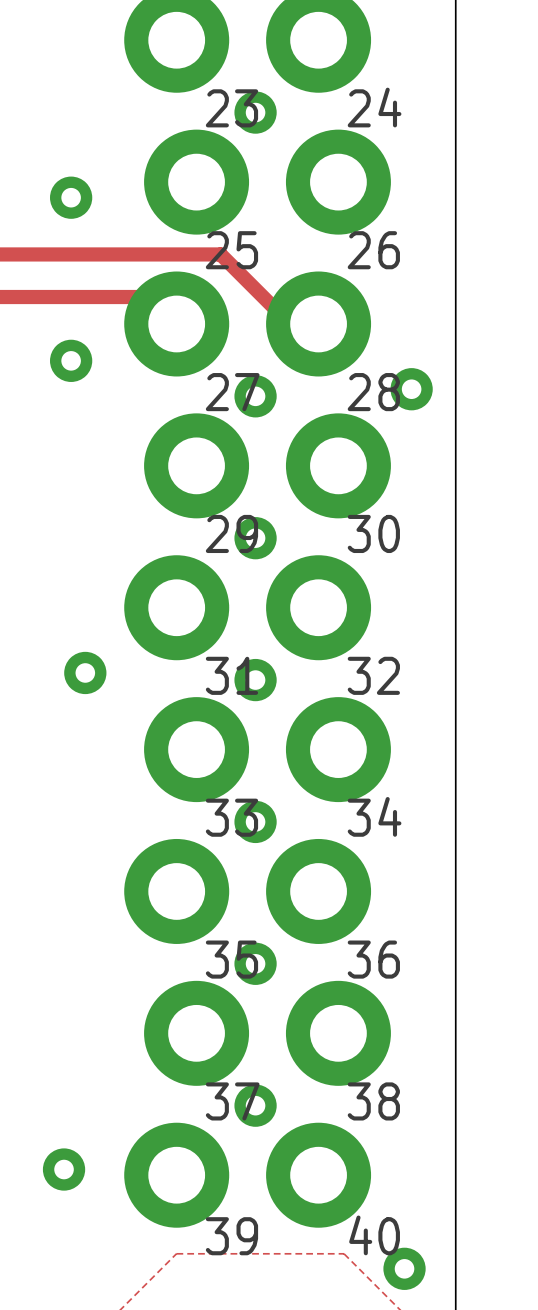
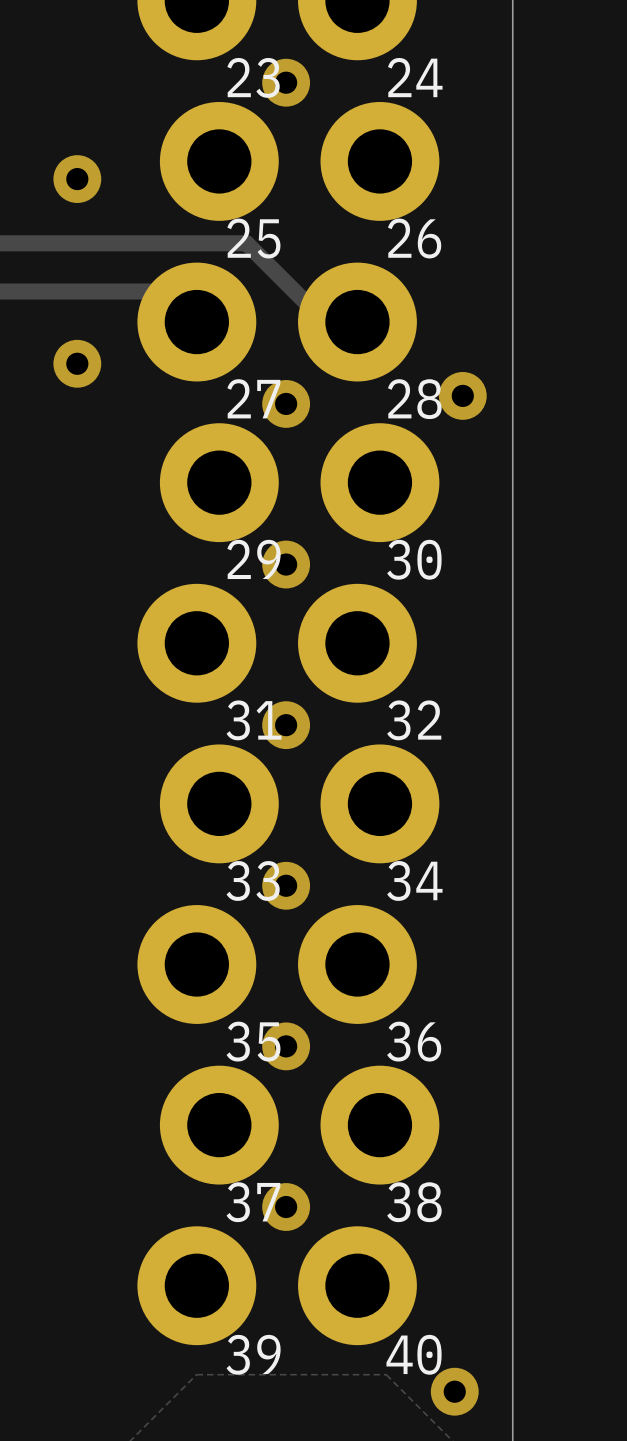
via: (85, 672) -> none
via: (64, 1169) -> none

